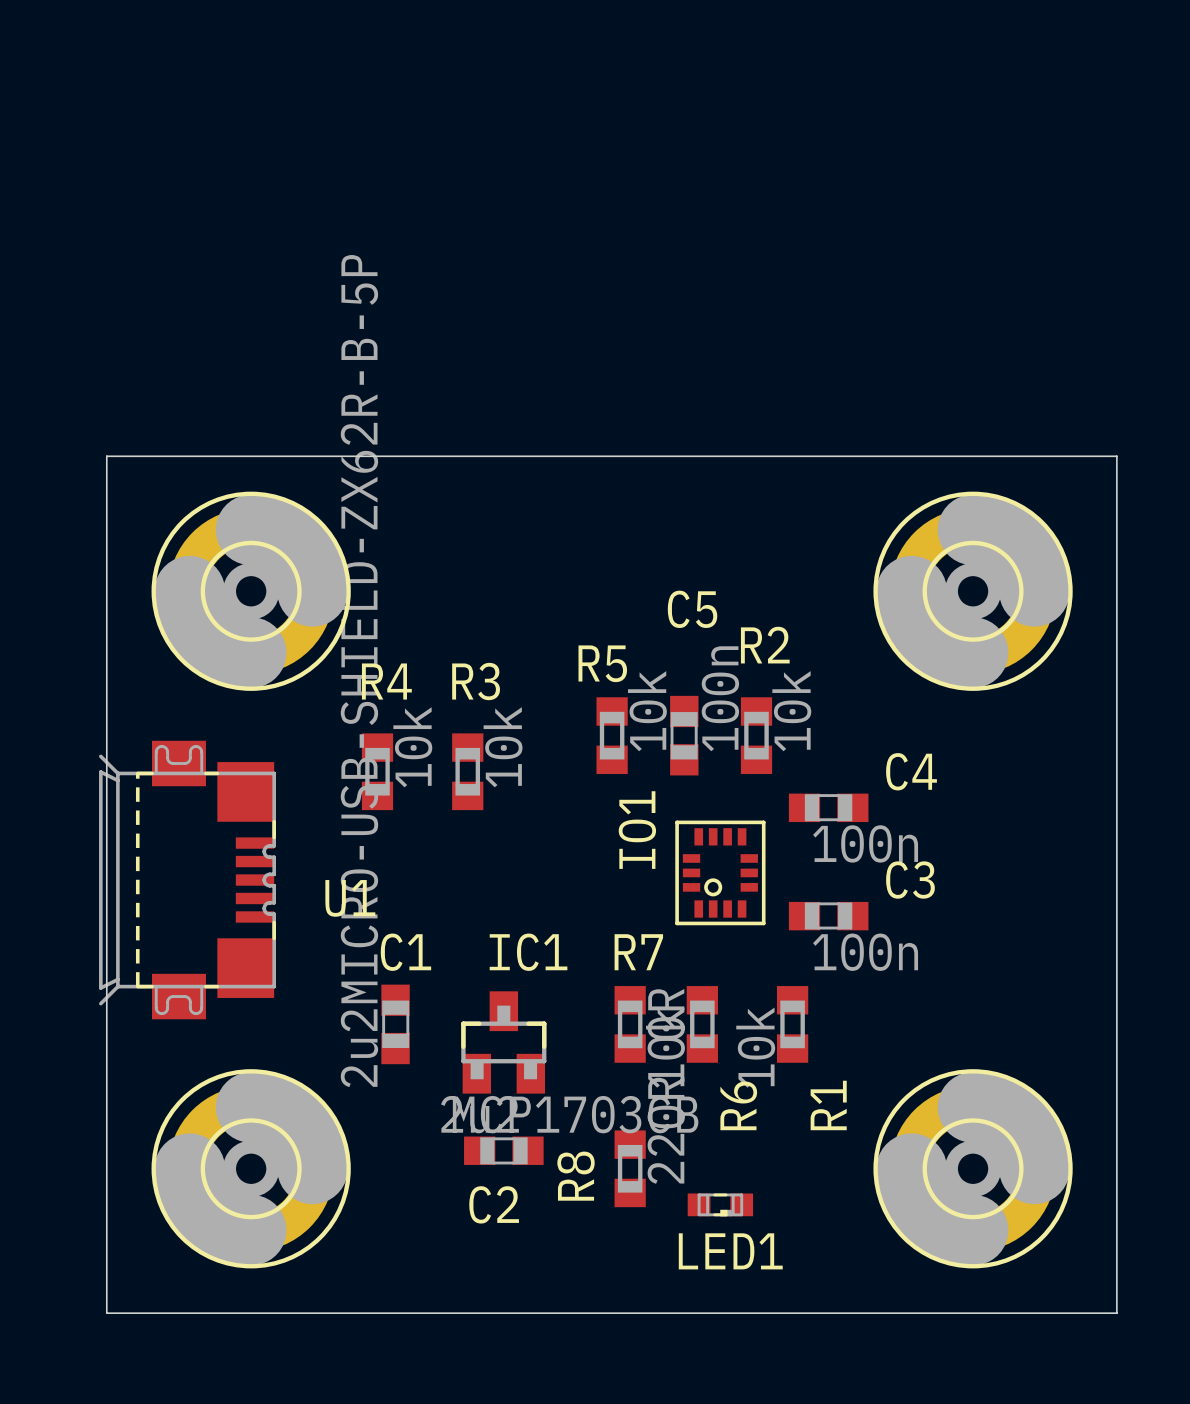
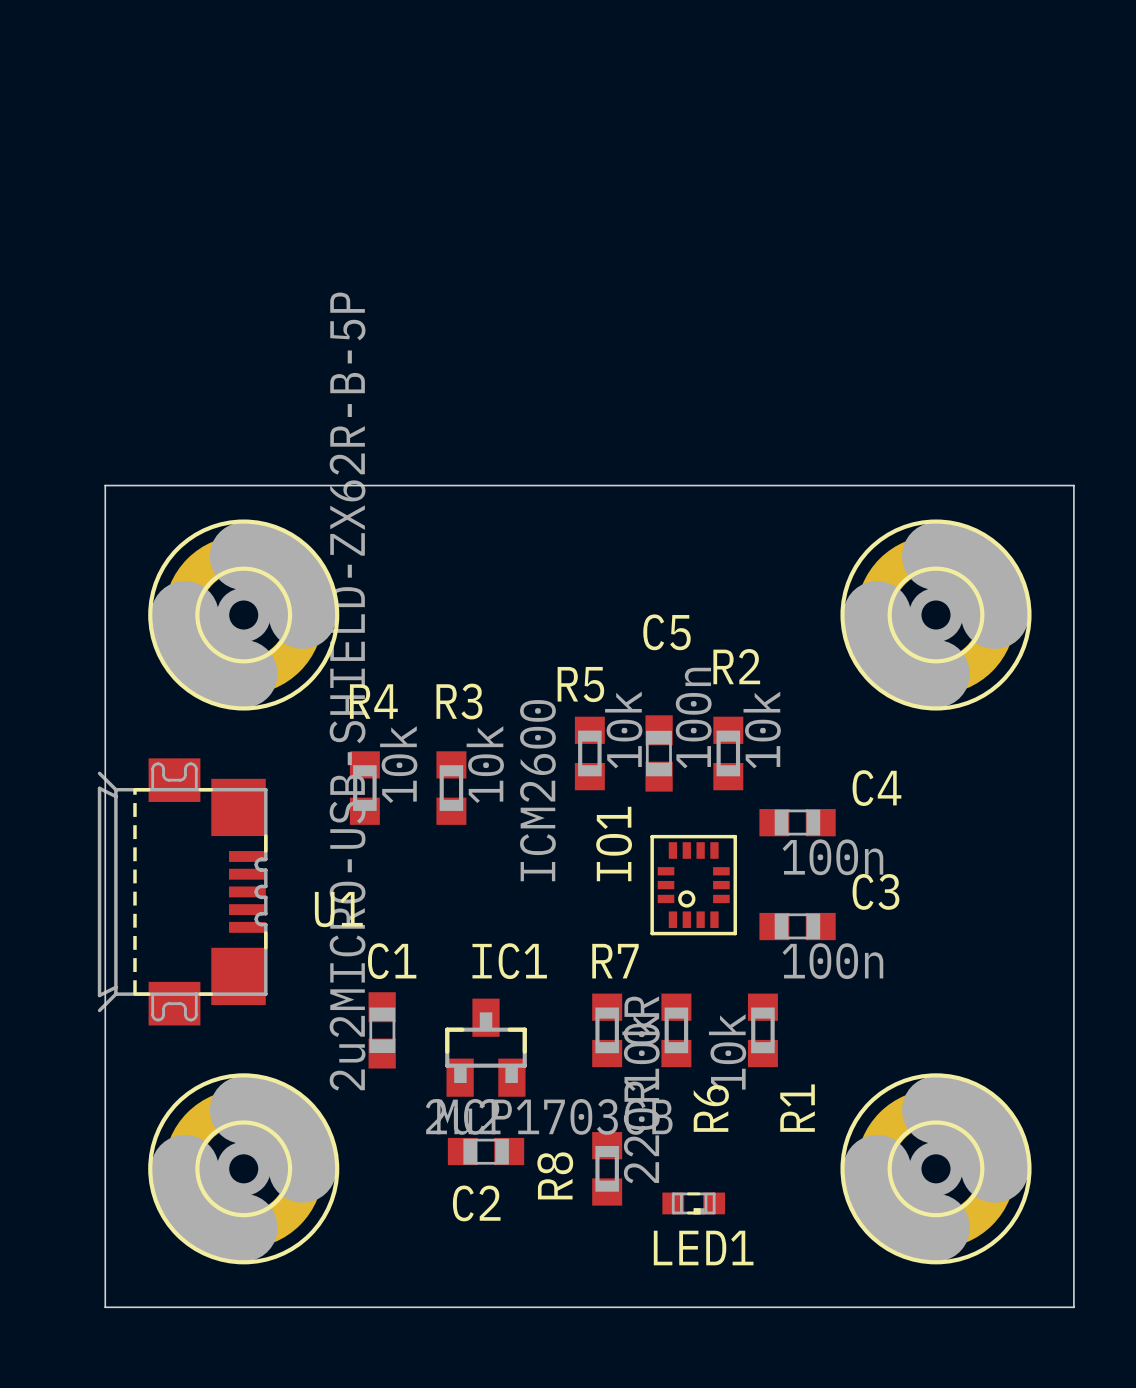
IO1 value: none -> ICM2600 (537, 790)

